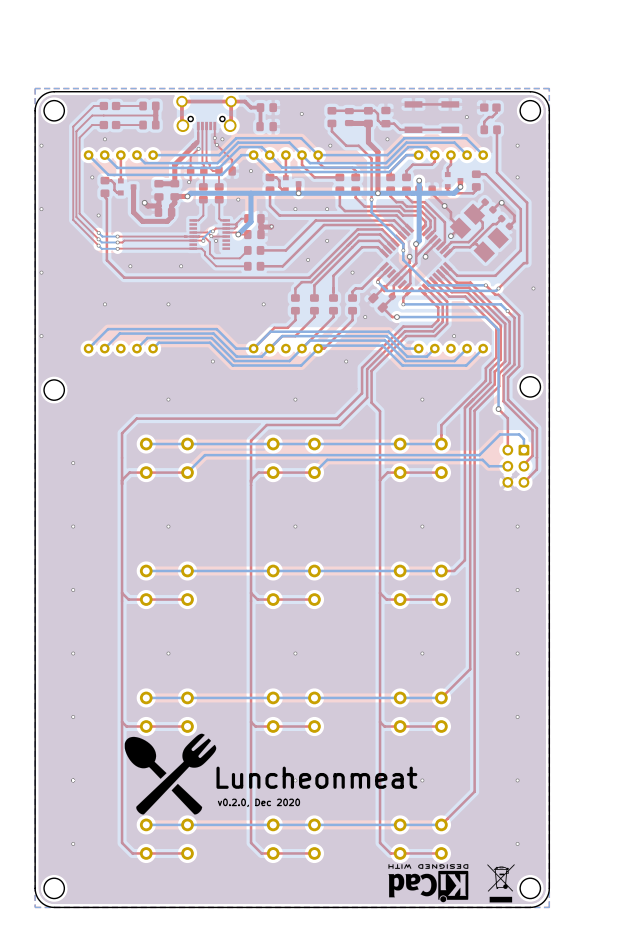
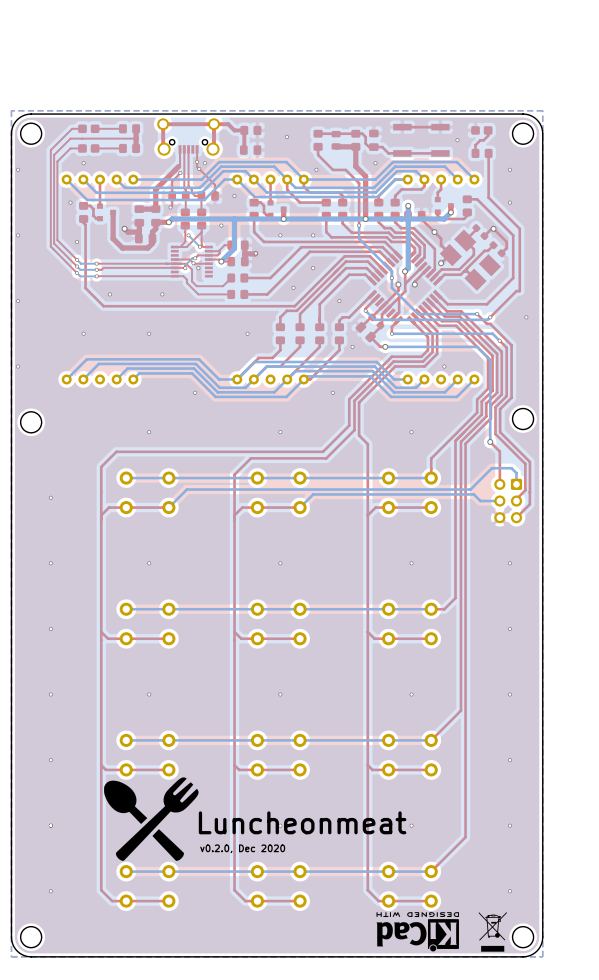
top track: none -> (201, 232) (186, 247) (180, 247)
bottom track: none -> (188, 235) (200, 246)
via: none -> (188, 235)
via: none -> (200, 246)

